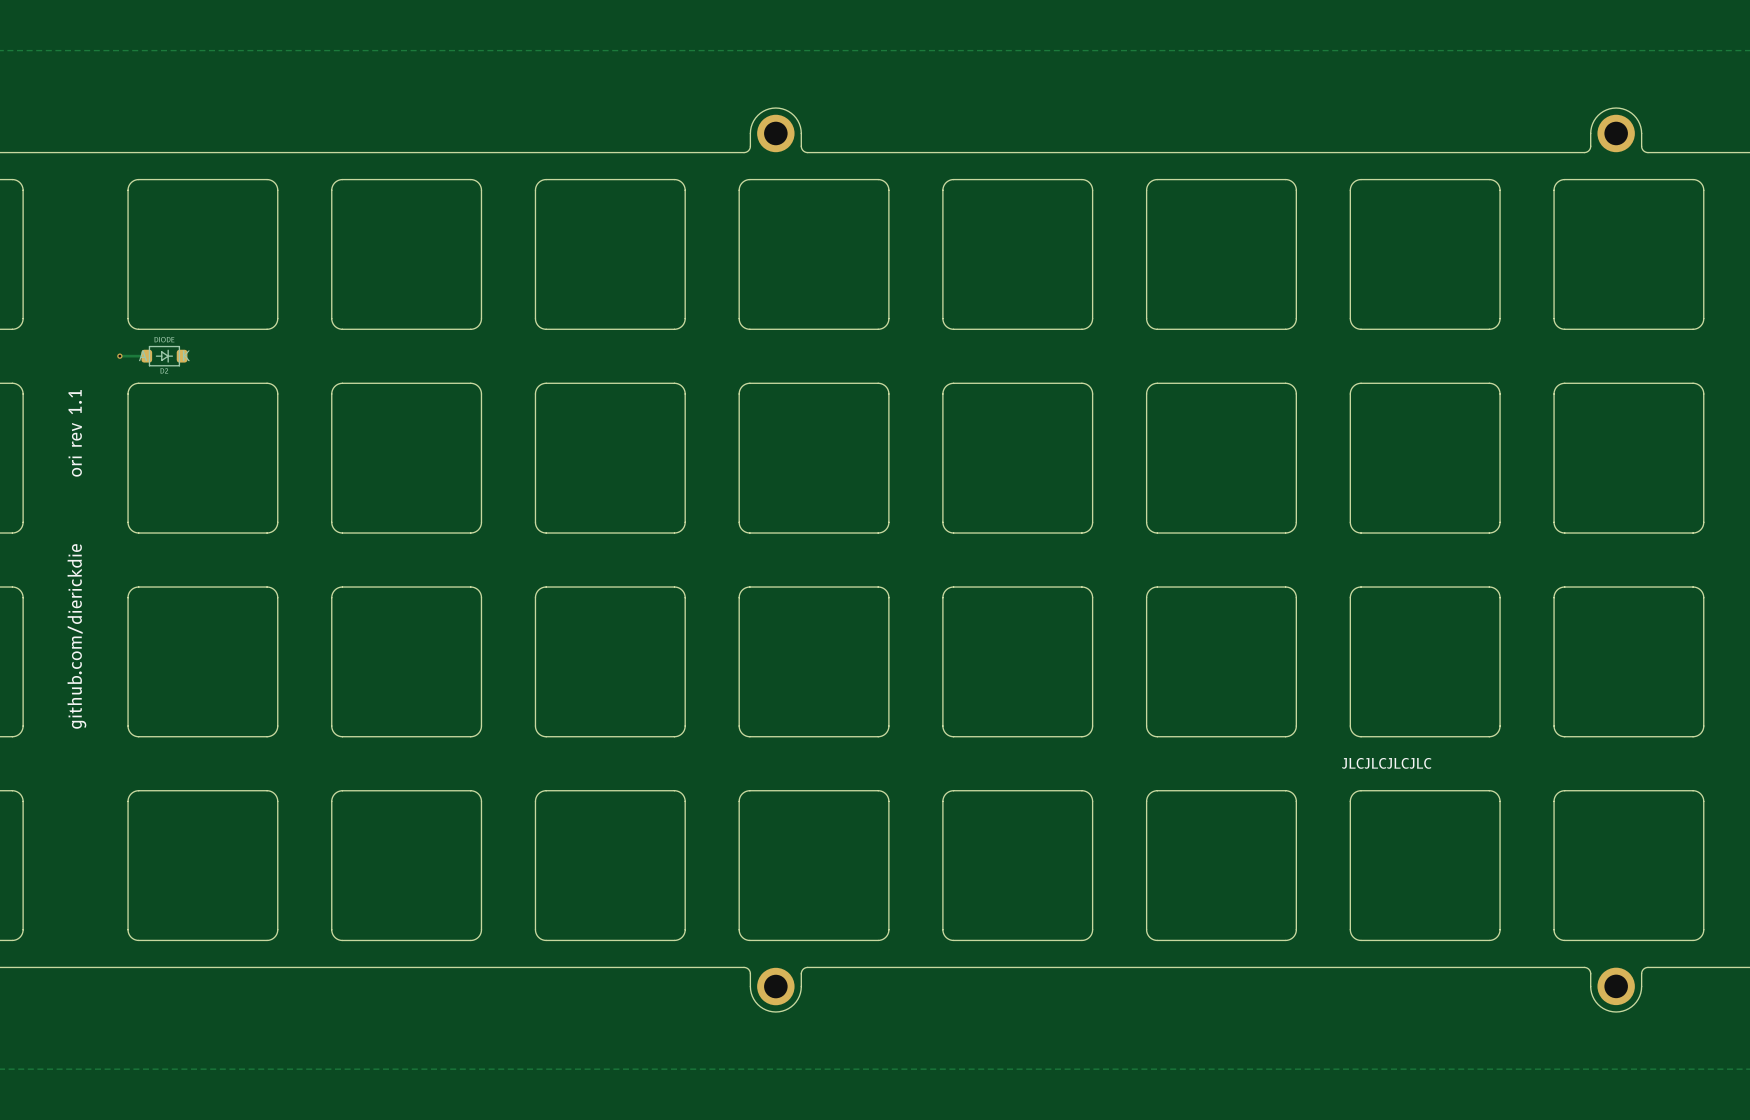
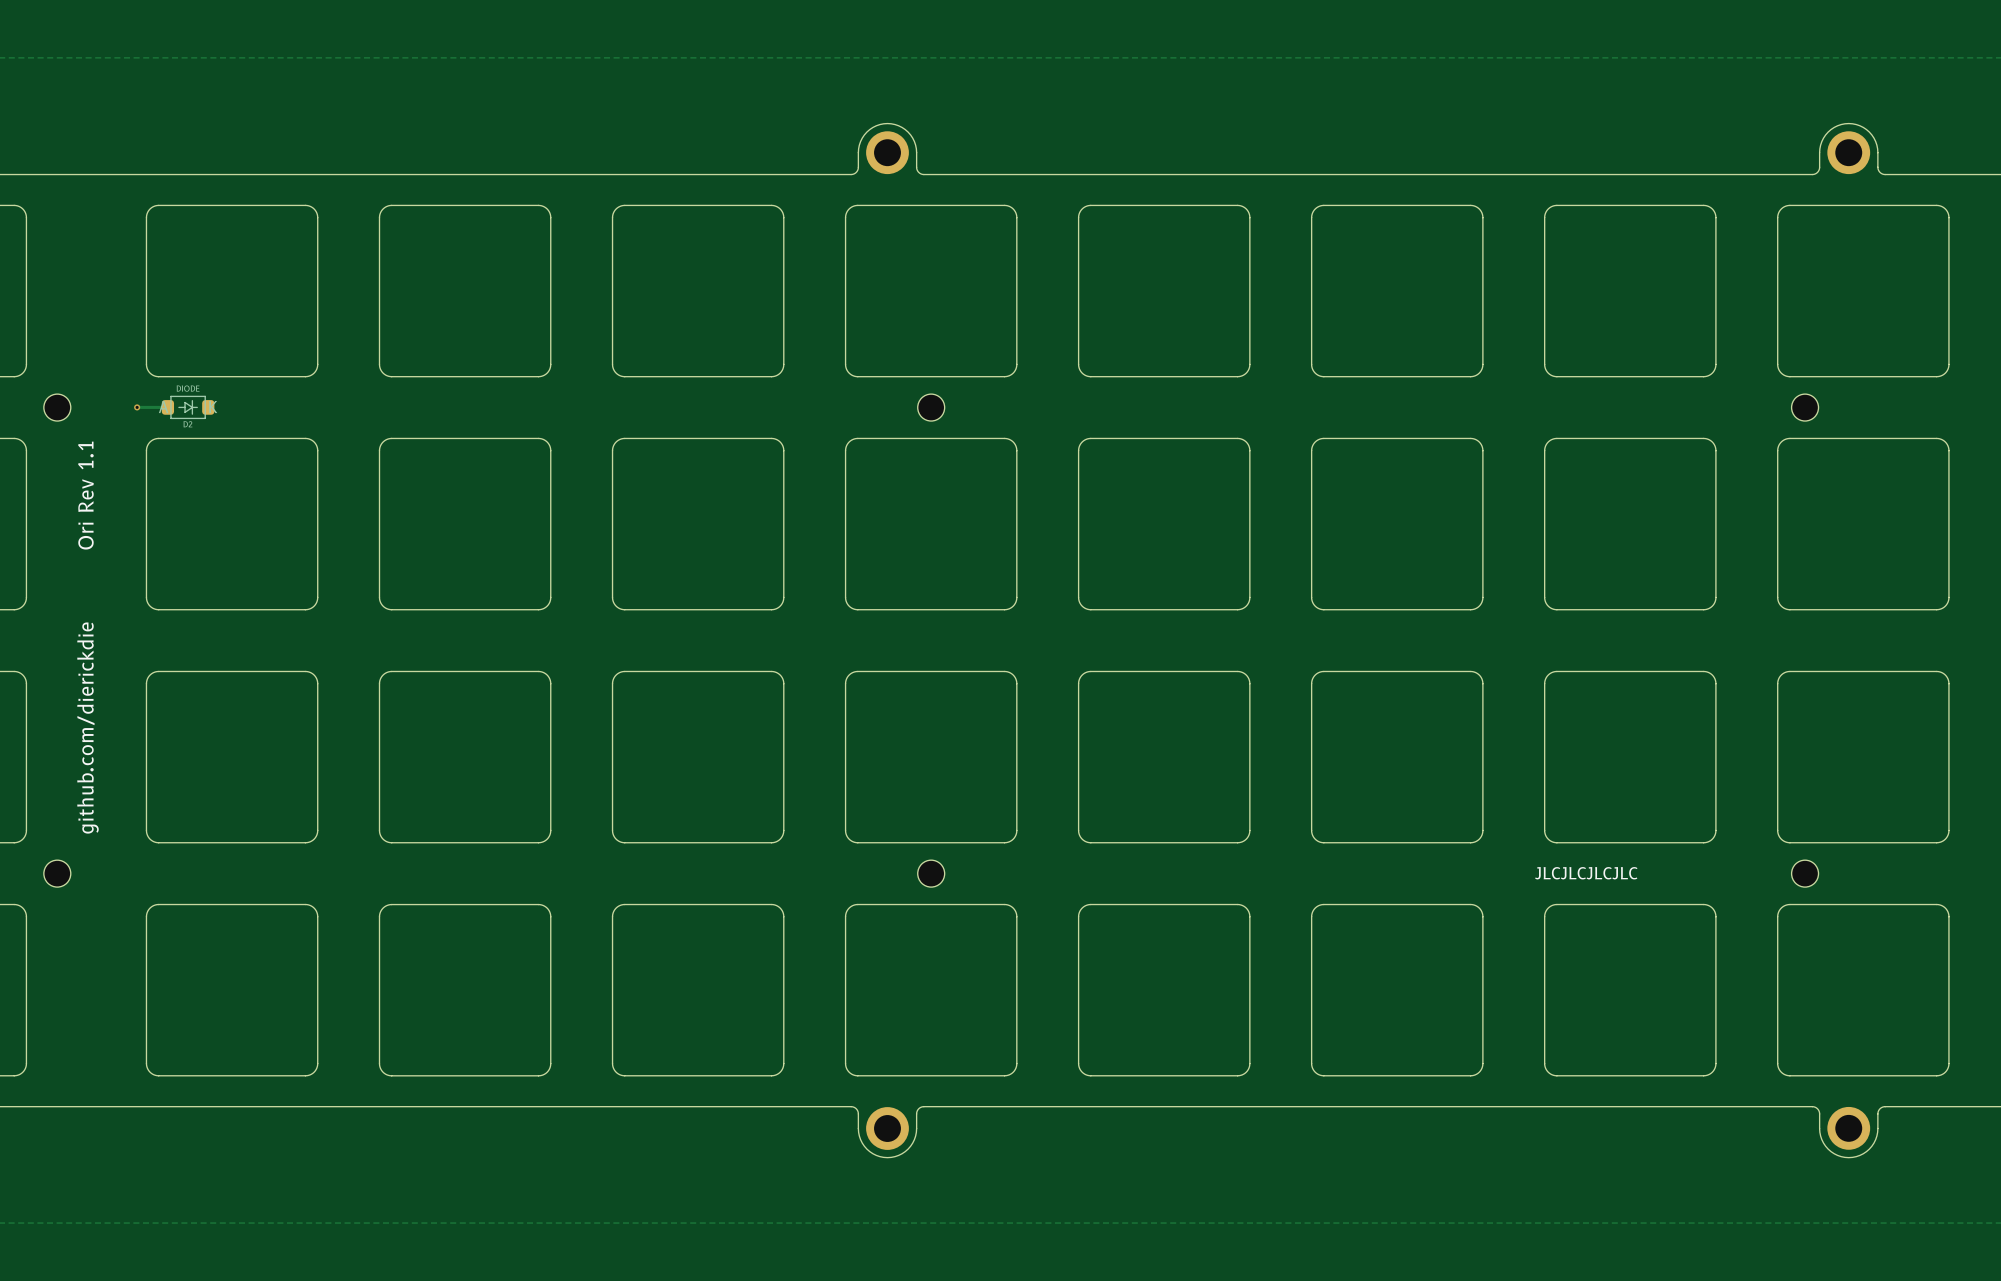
part: none -> (57, 407)
part: none -> (931, 407)
part: none -> (1805, 407)
text: ori rev 1.1 (75, 433) -> Ori Rev 1.1 (85, 495)
part: none -> (57, 873)
part: none -> (931, 873)
part: none -> (1805, 873)

